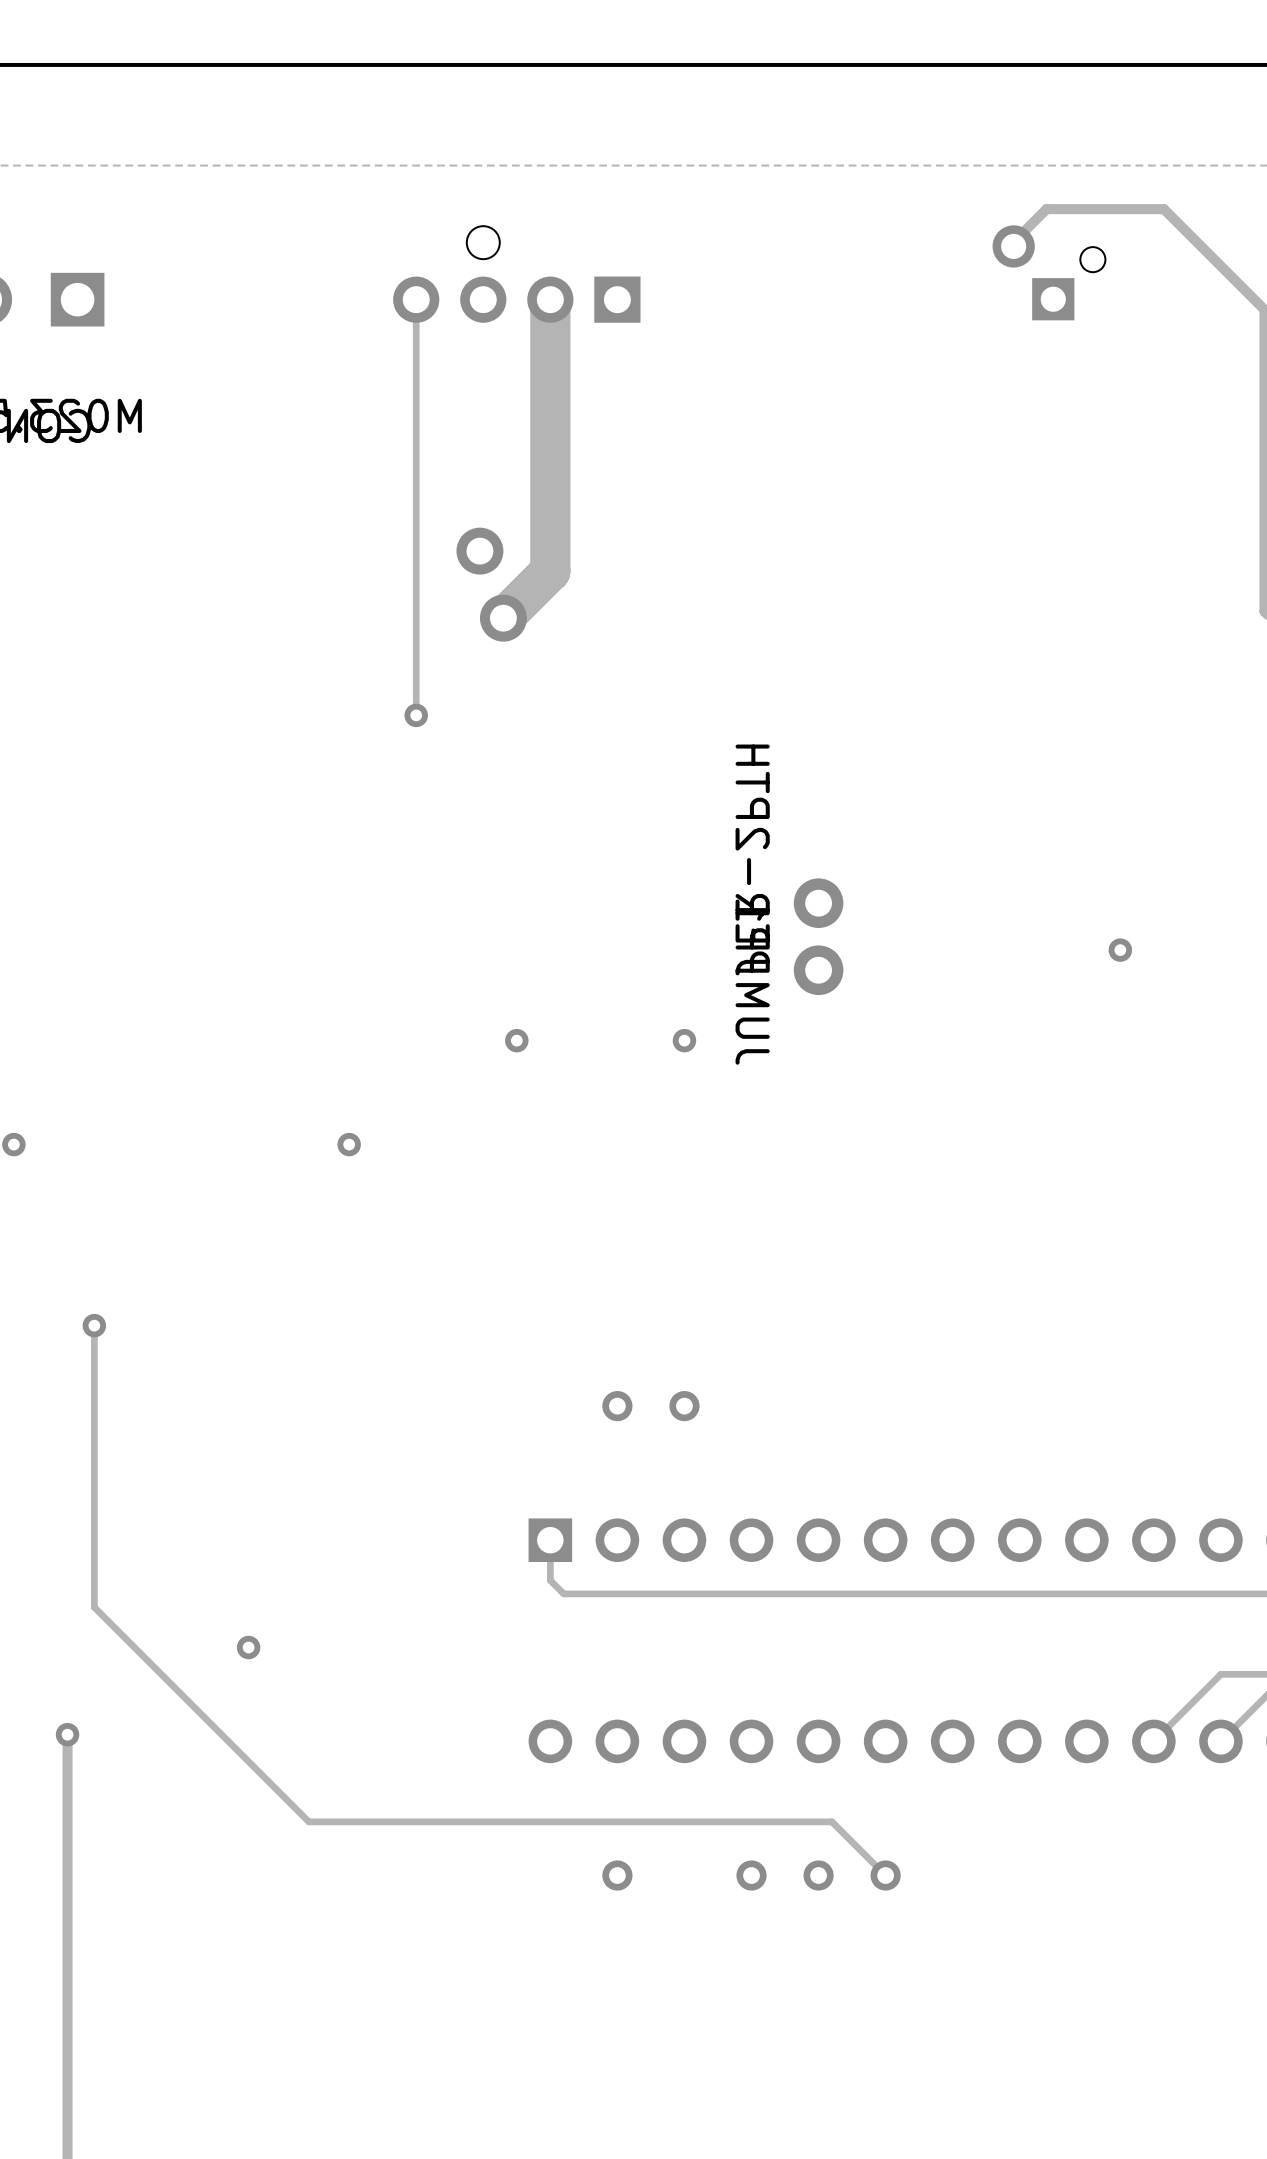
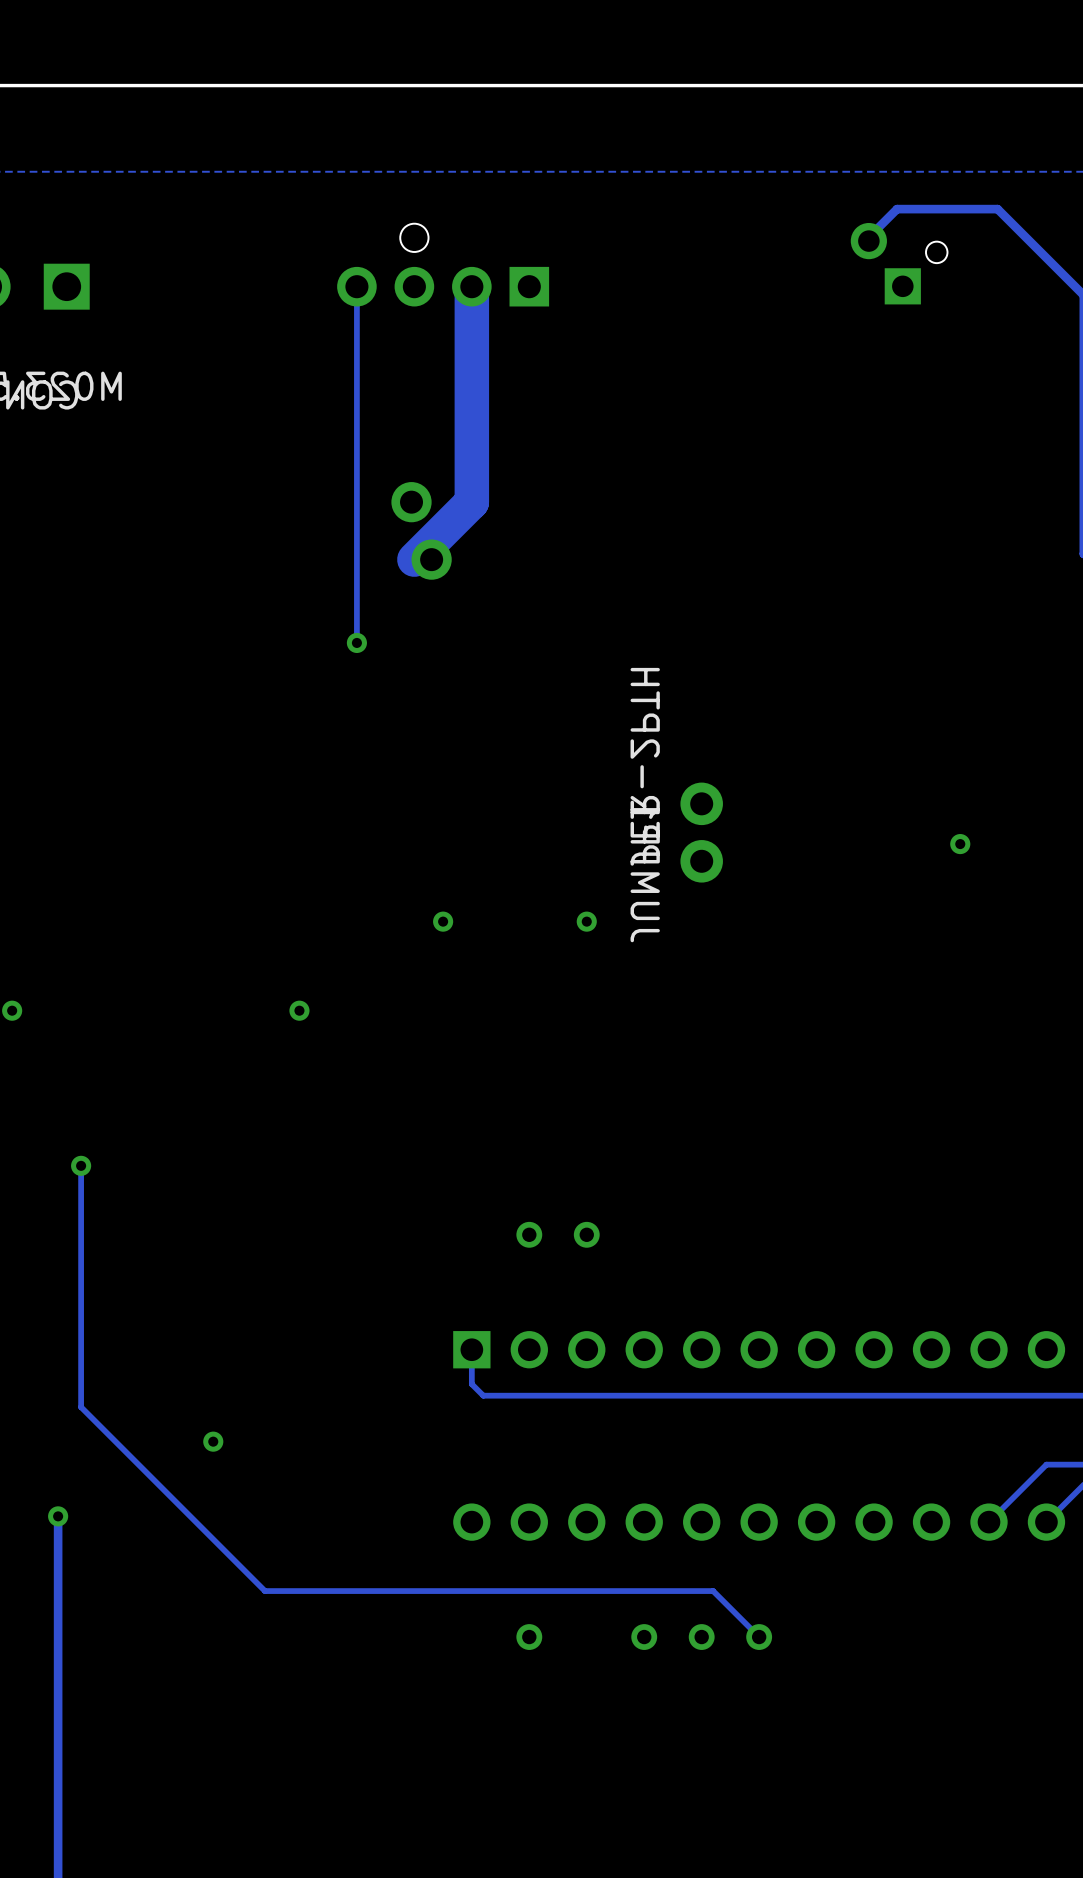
track: (550, 551) (550, 571) (503, 618) -> (471, 502) (414, 559)

